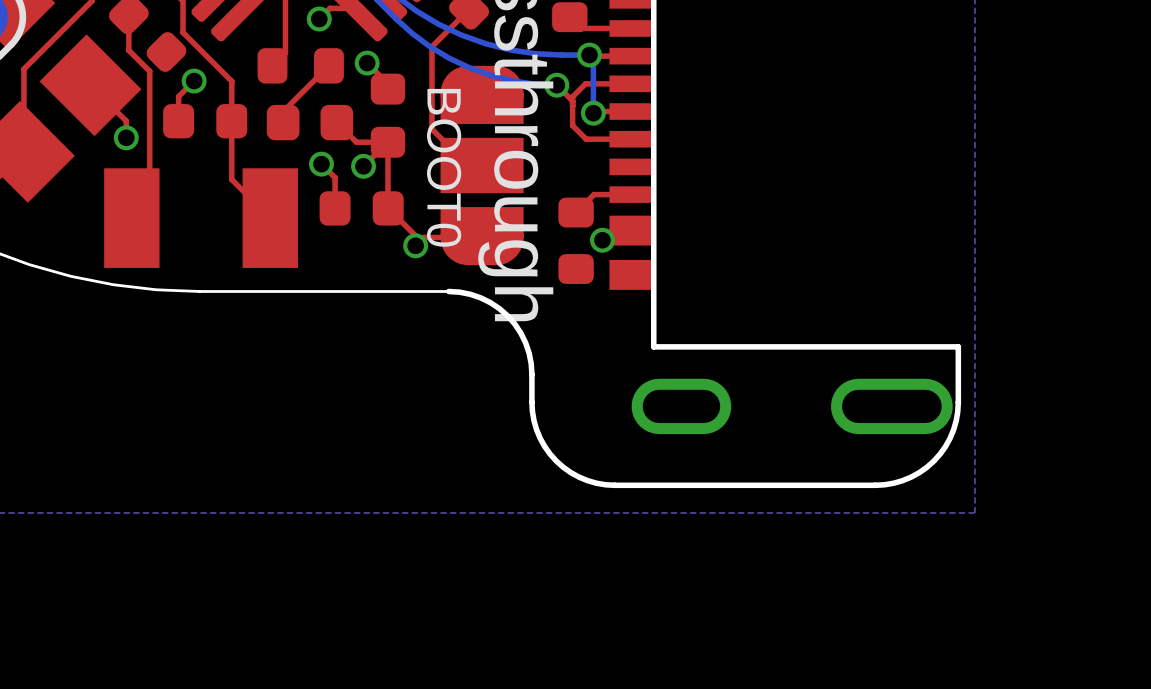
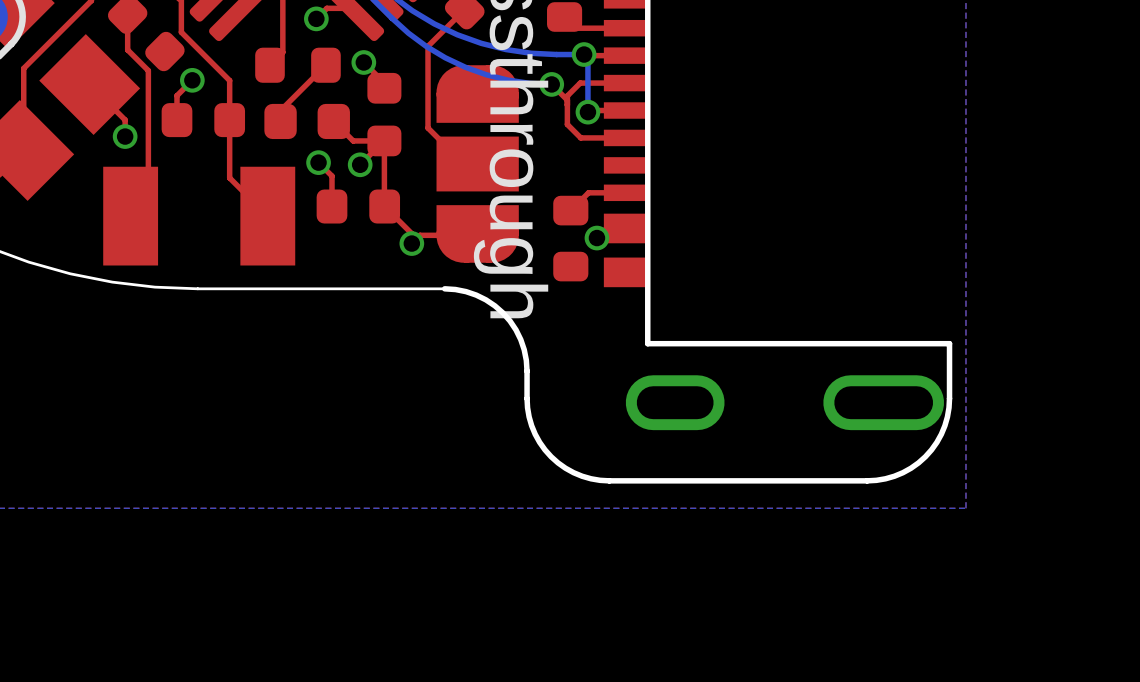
text: BOOT0 (444, 167) -> none

